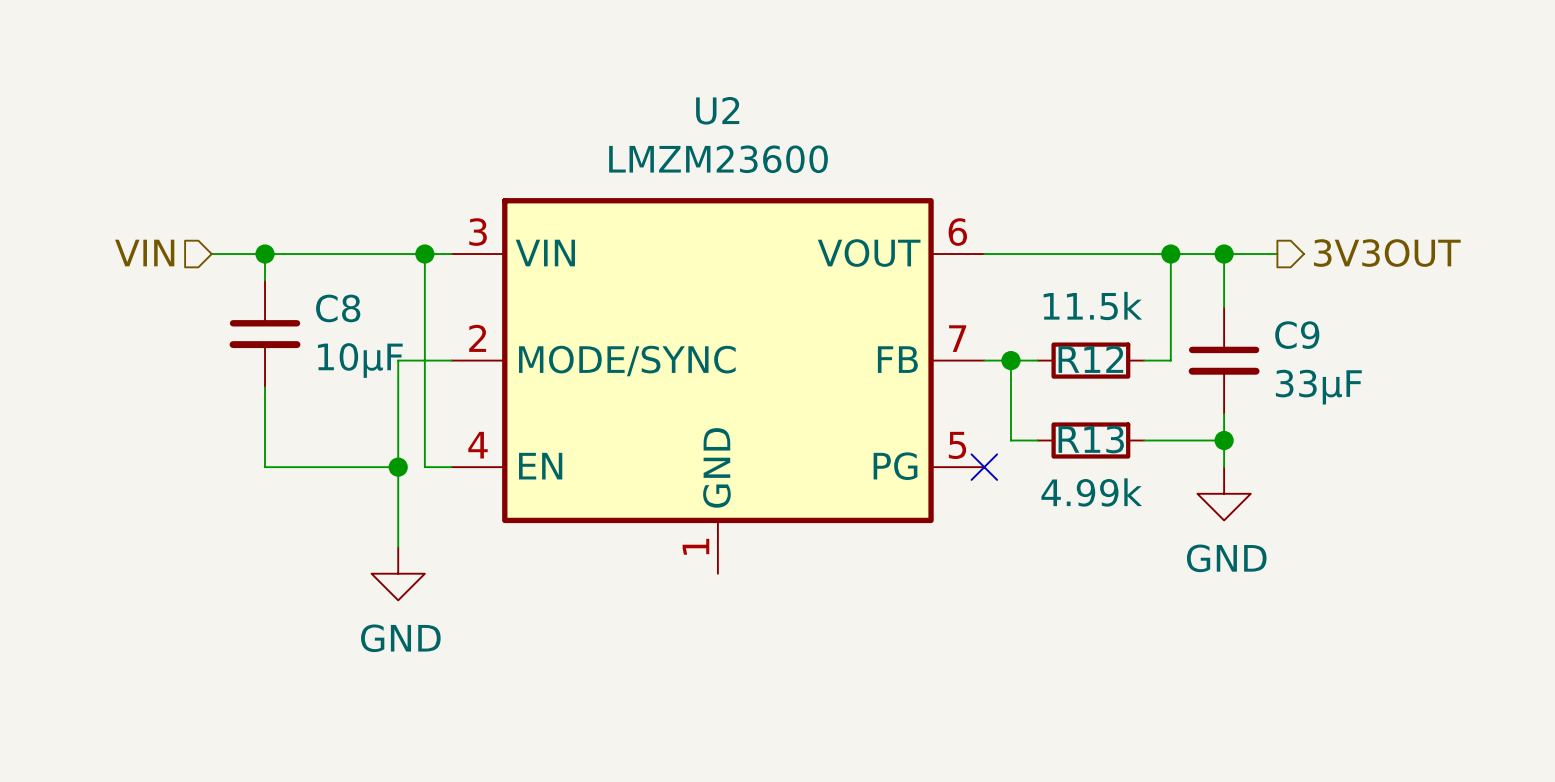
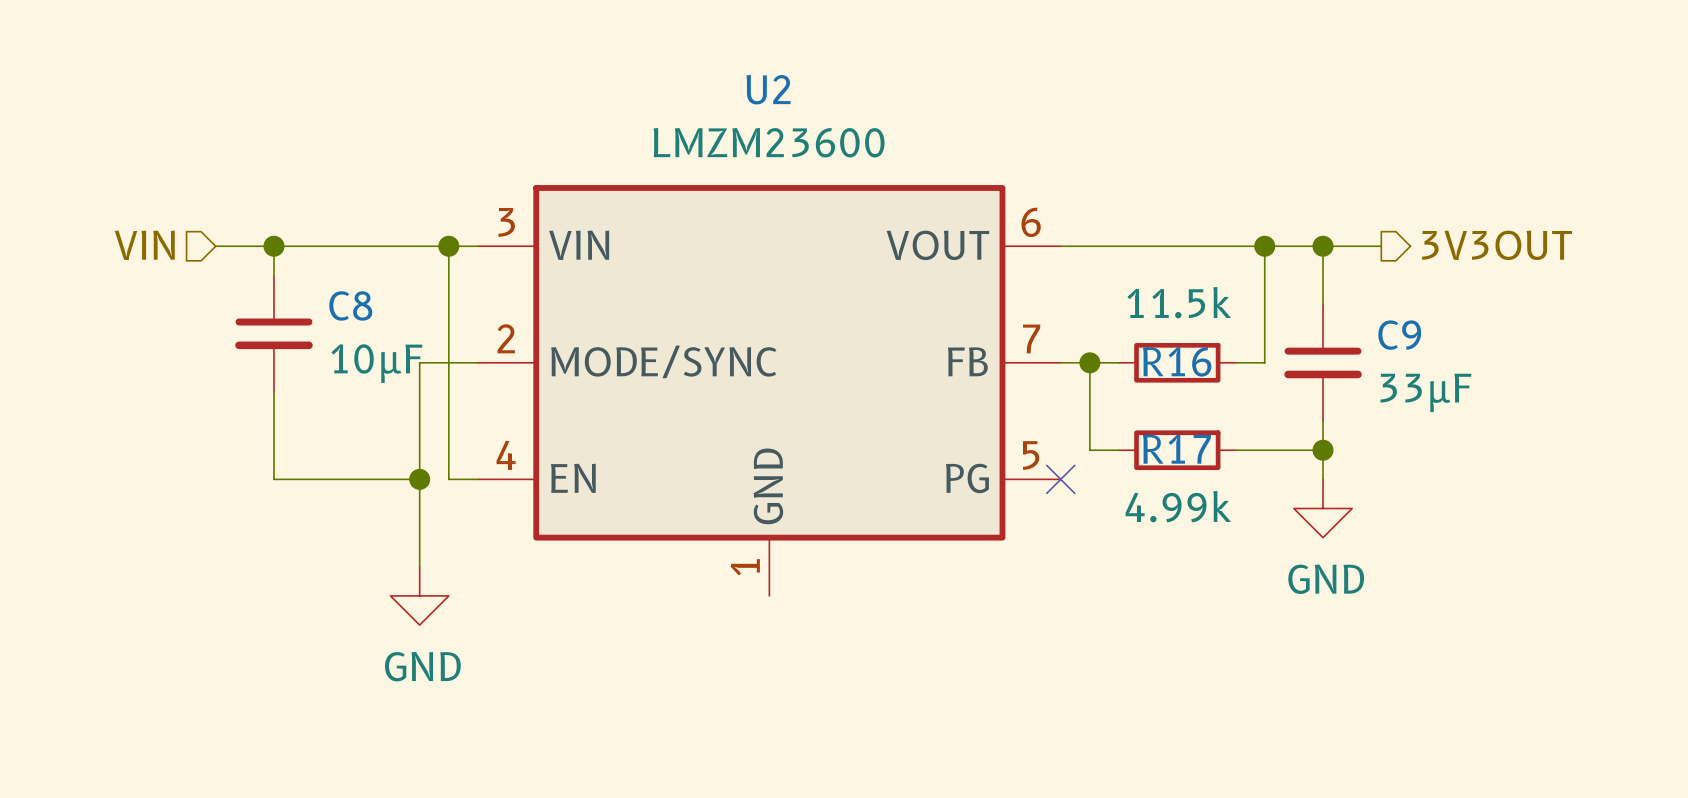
R12 name: R12 (1090, 359) -> R16 (1177, 361)
R13 name: R13 (1091, 439) -> R17 (1176, 449)

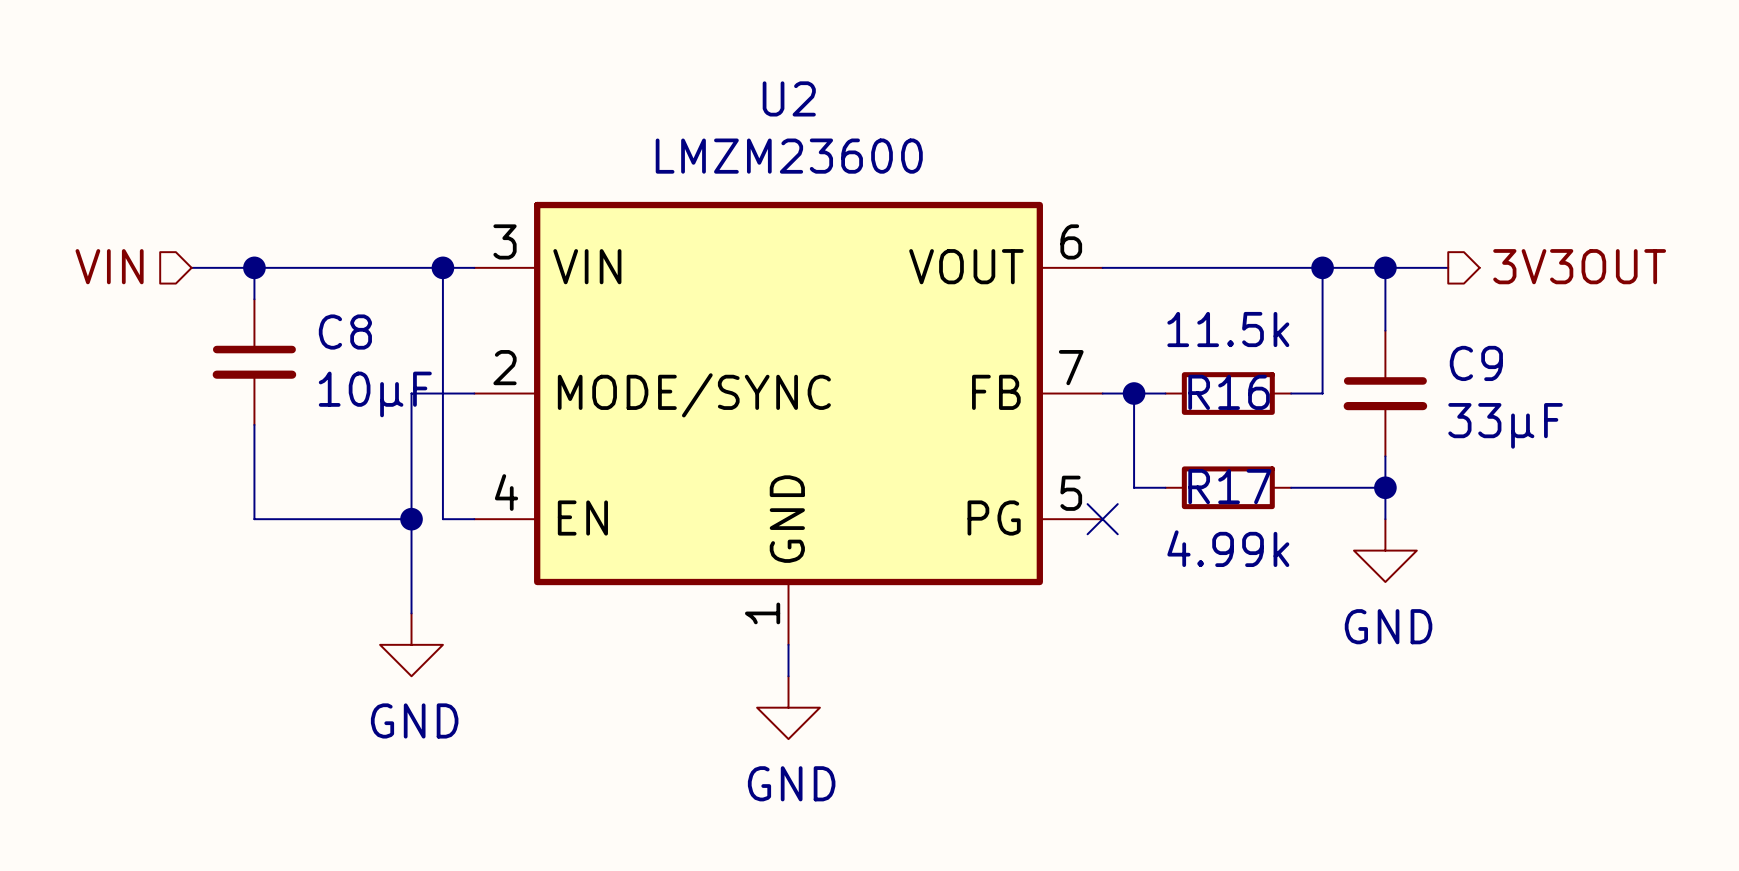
wire: none -> (788, 644) (788, 676)
power symbol: none -> GND (788, 707)

